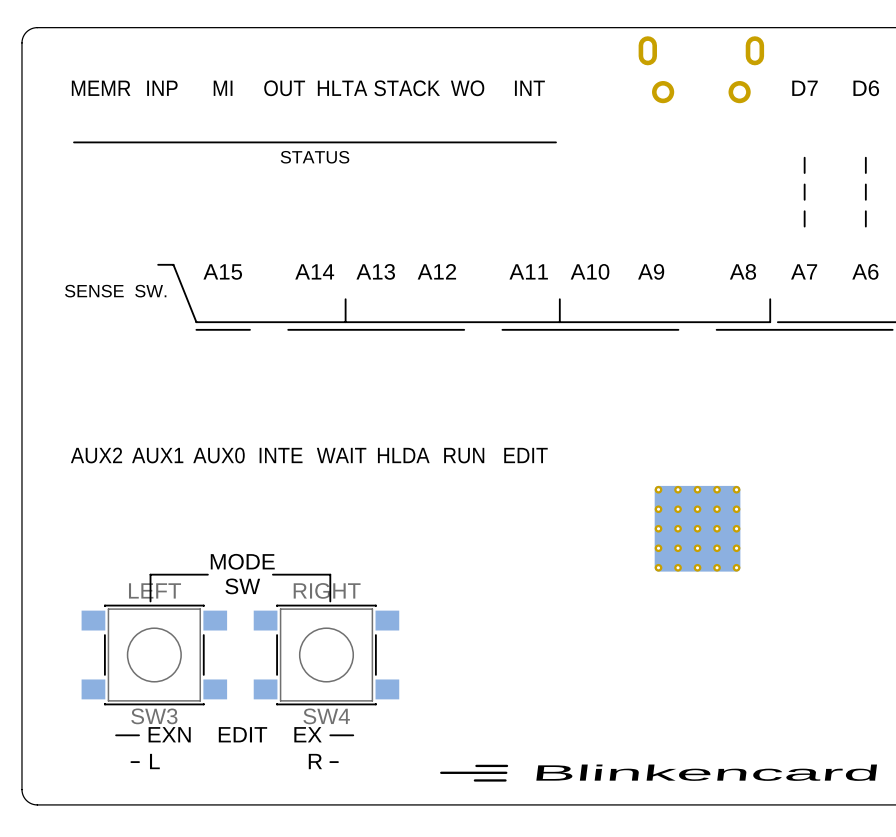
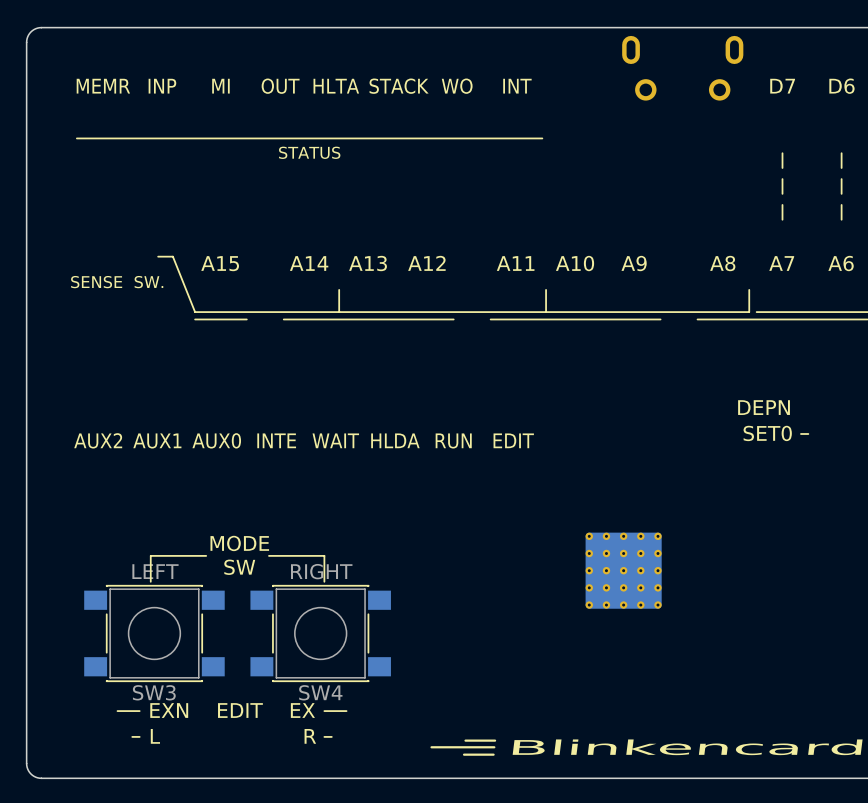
text: none -> DEPN (764, 407)
text: none -> SET0 (767, 433)
line: none -> (808, 433) (800, 433)
part: (697, 528) -> none
part: none -> (623, 570)

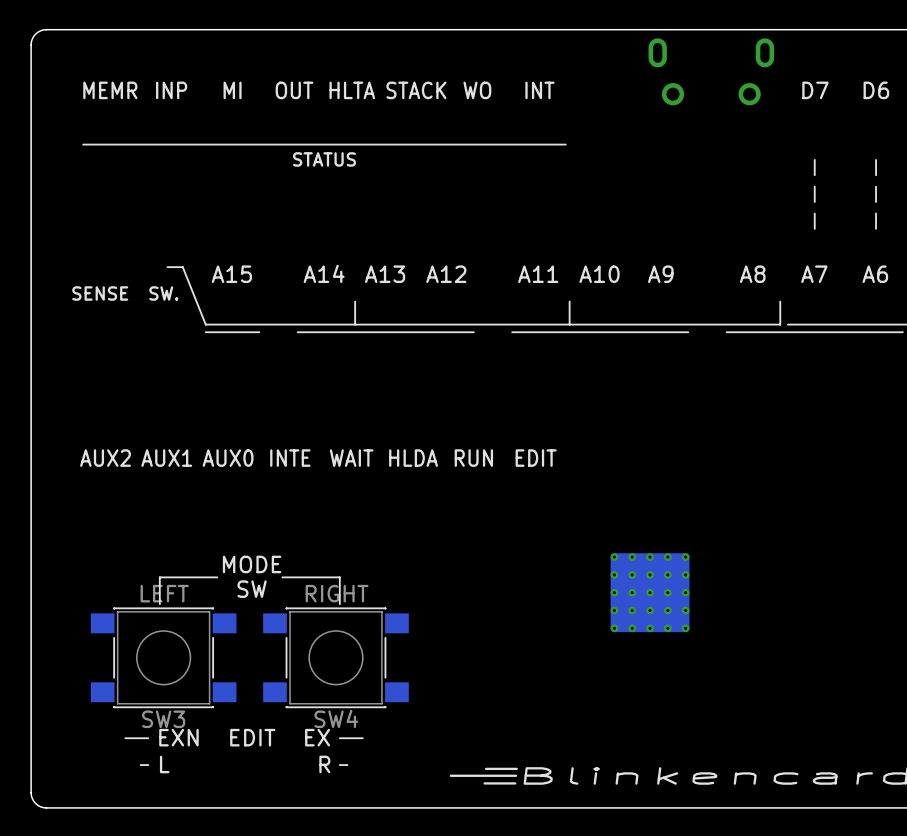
text: DEPN (764, 407) -> none
text: SET0 (767, 433) -> none
line: (808, 433) (800, 433) -> none

